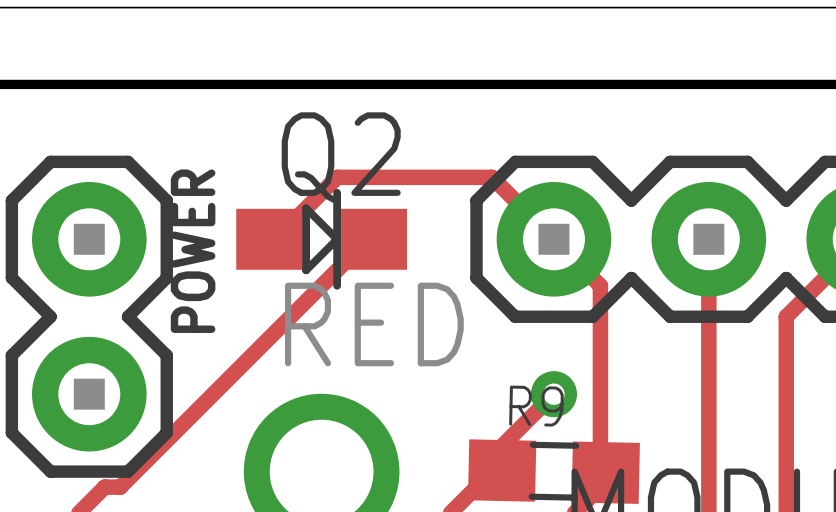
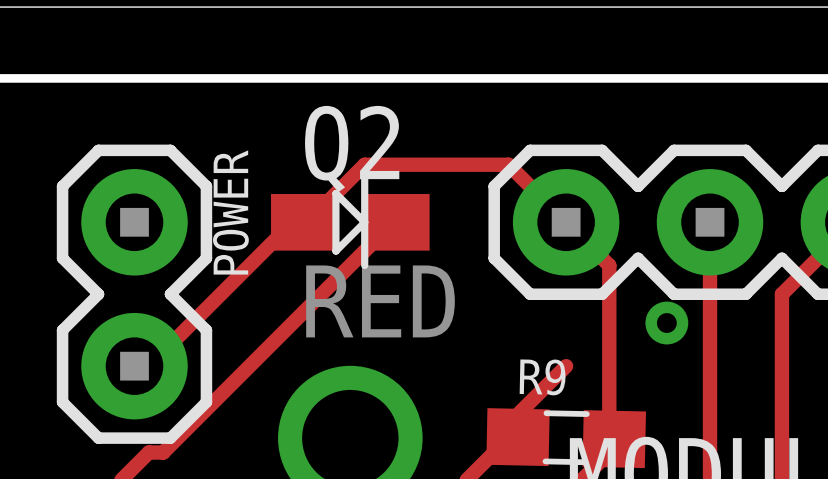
track: none -> (302, 222) (292, 222) (148, 366) (134, 366)
via: none -> (666, 323)
via: (553, 394) -> none

